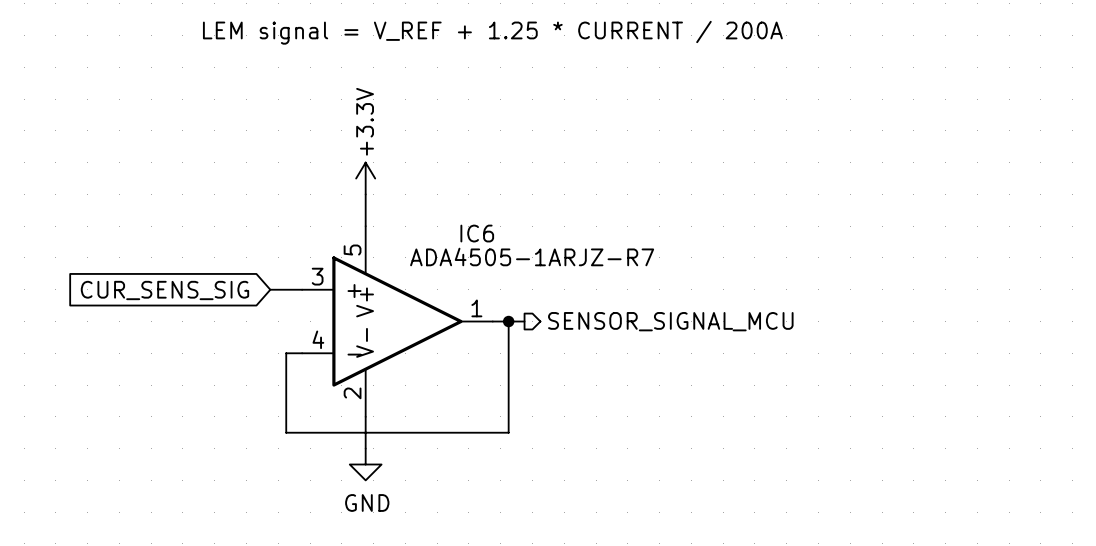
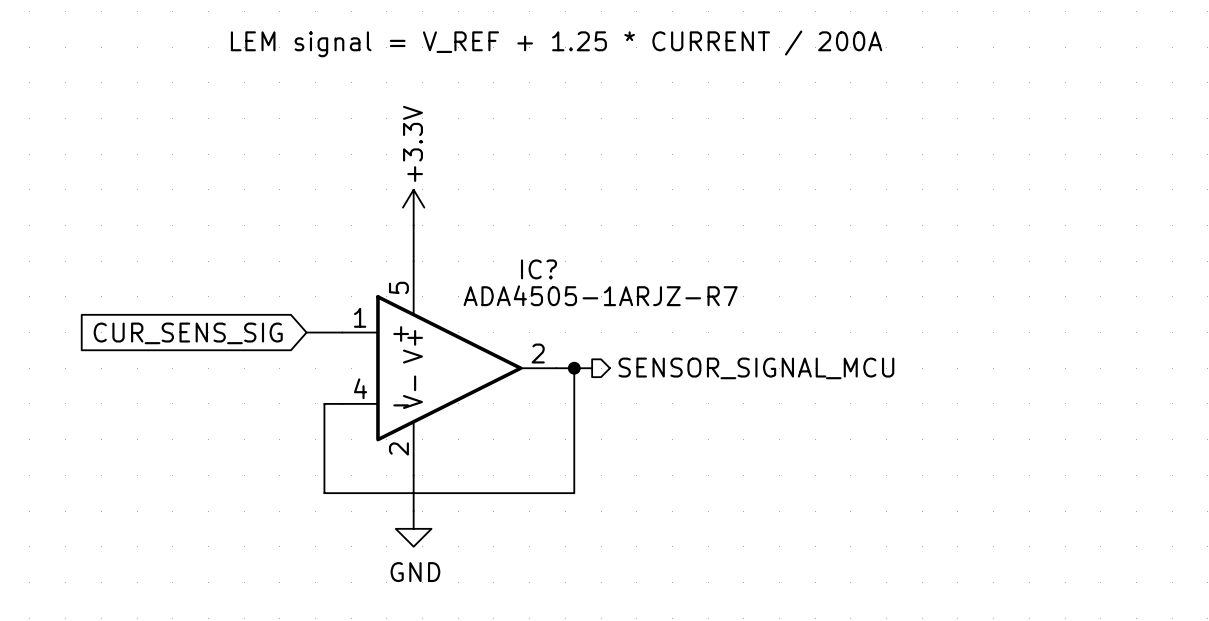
IC6 name: IC6 (477, 233) -> IC? (539, 269)
IC6 pin number: 3 (317, 276) -> 1 (360, 317)
IC6 pin number: 1 (476, 308) -> 2 (538, 353)

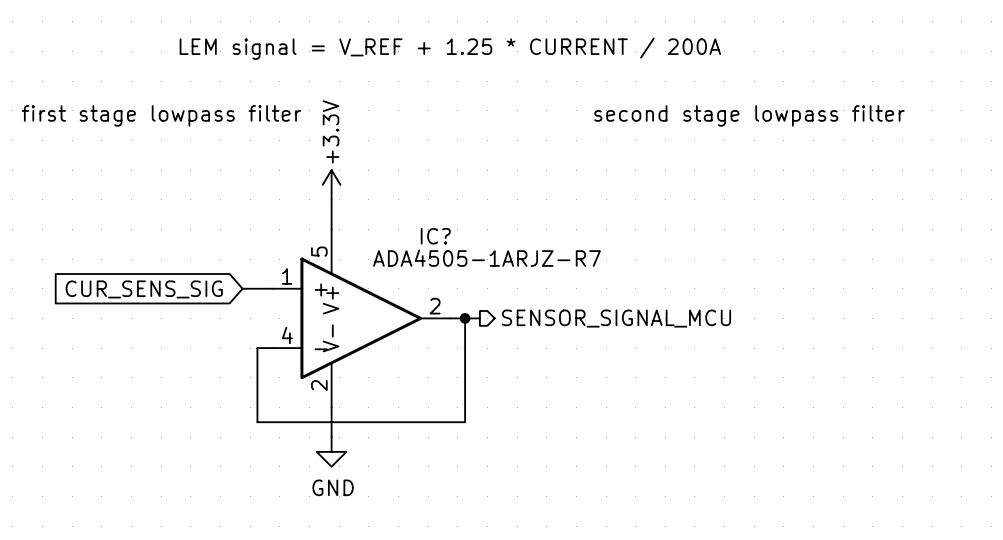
text: none -> first stage lowpass filter (161, 115)
text: none -> second stage lowpass filter (749, 115)

